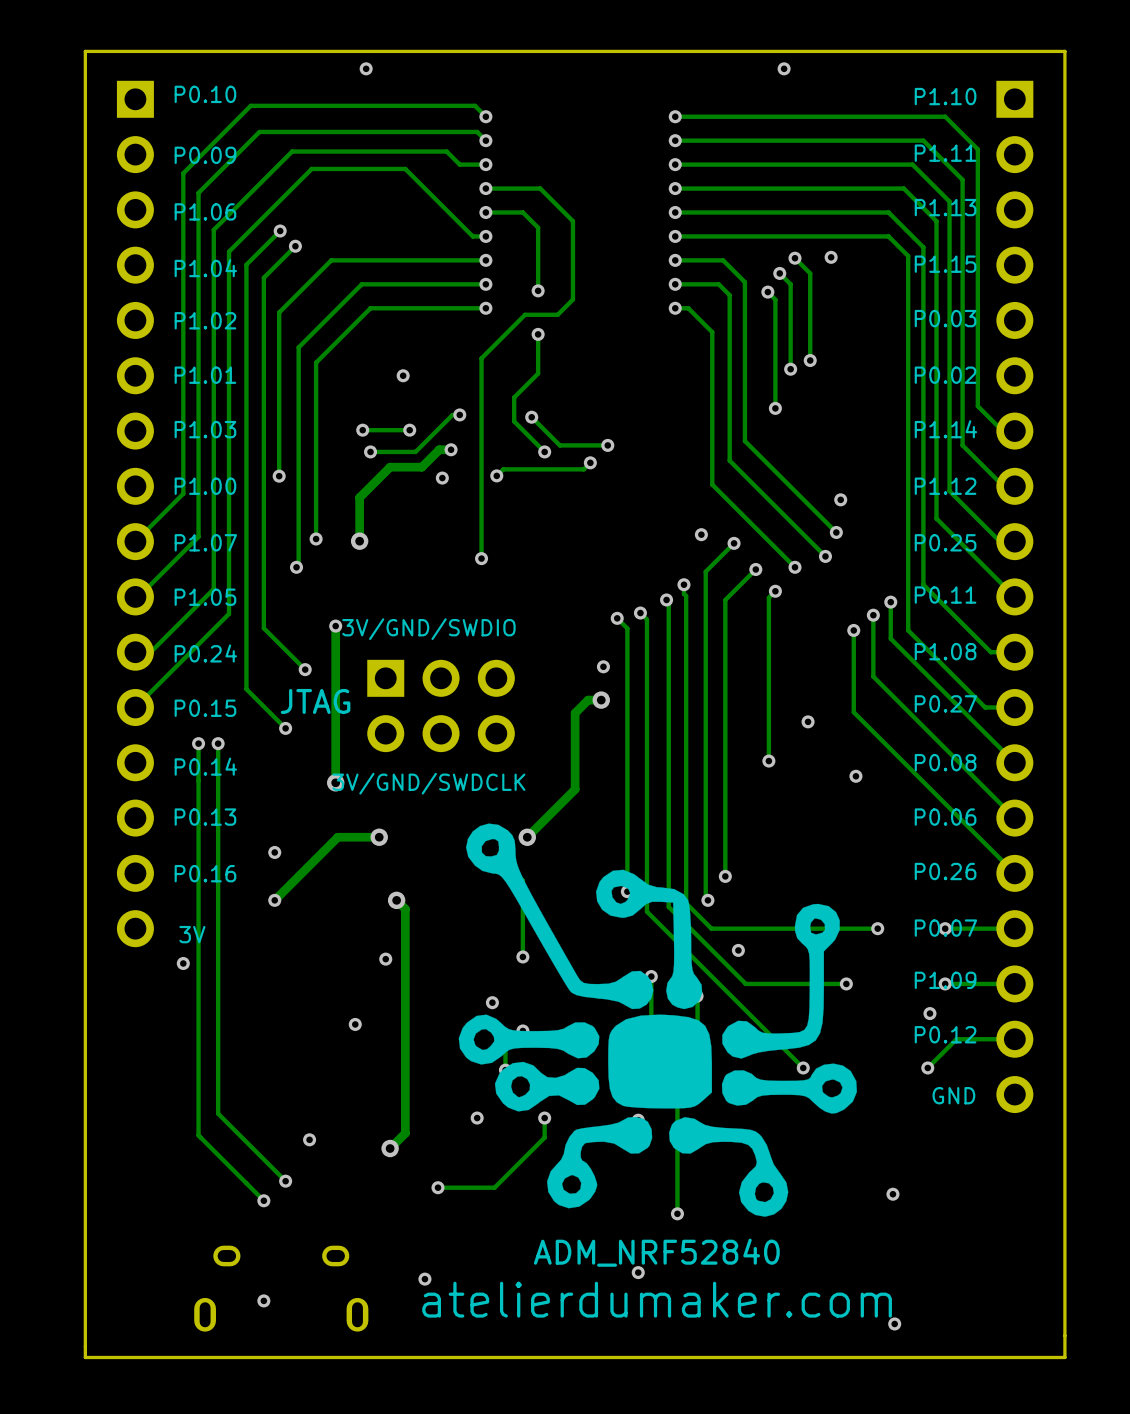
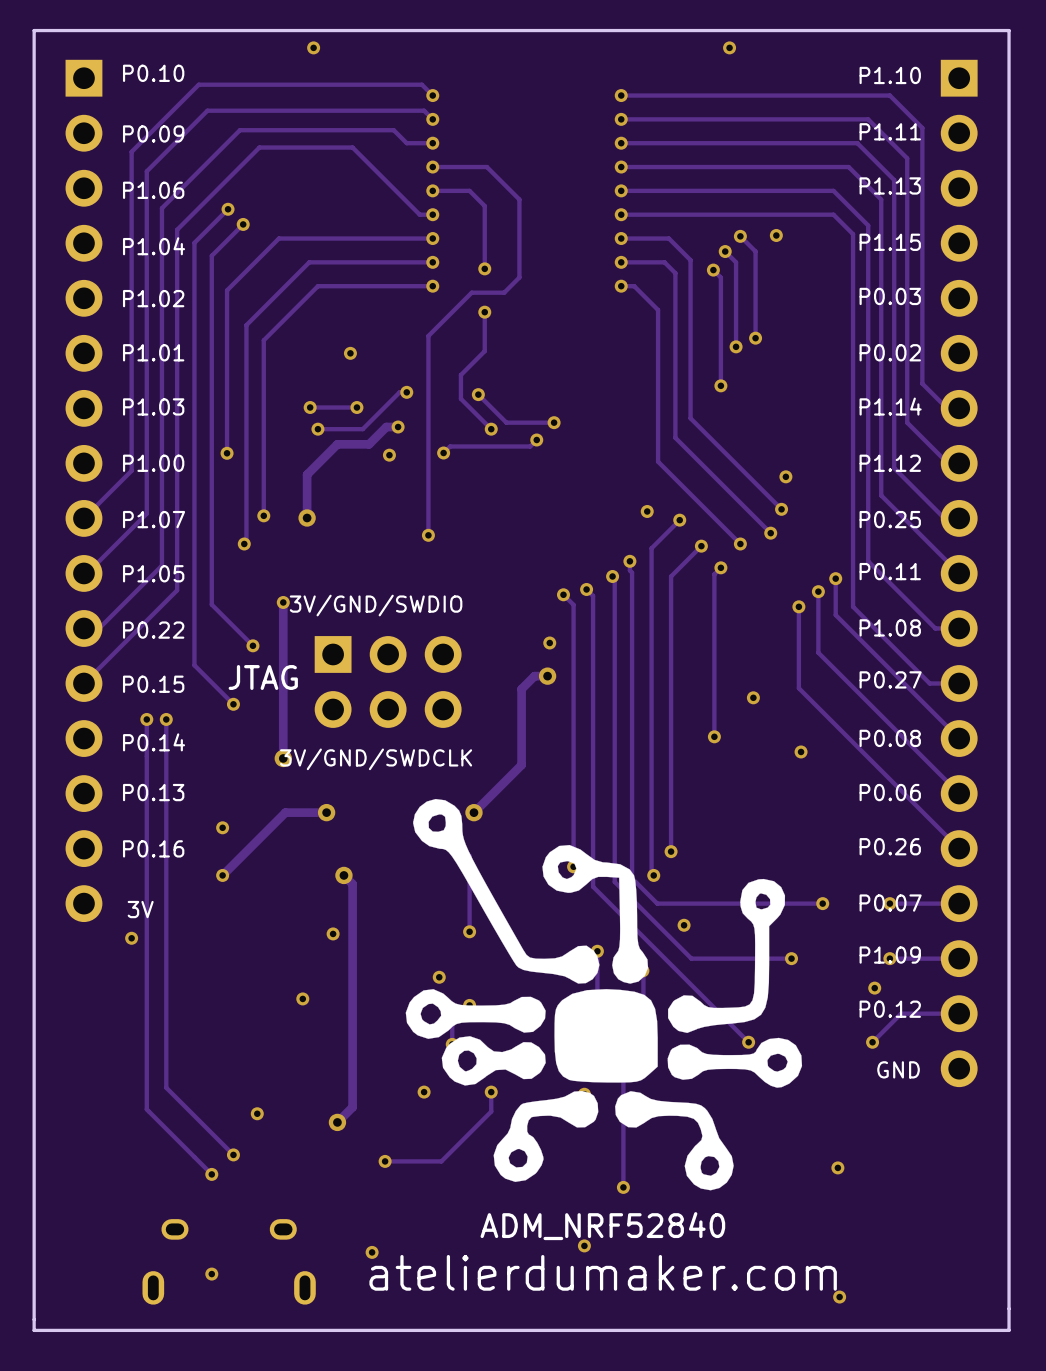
text: P0.24 (205, 653) -> P0.22 (153, 630)

